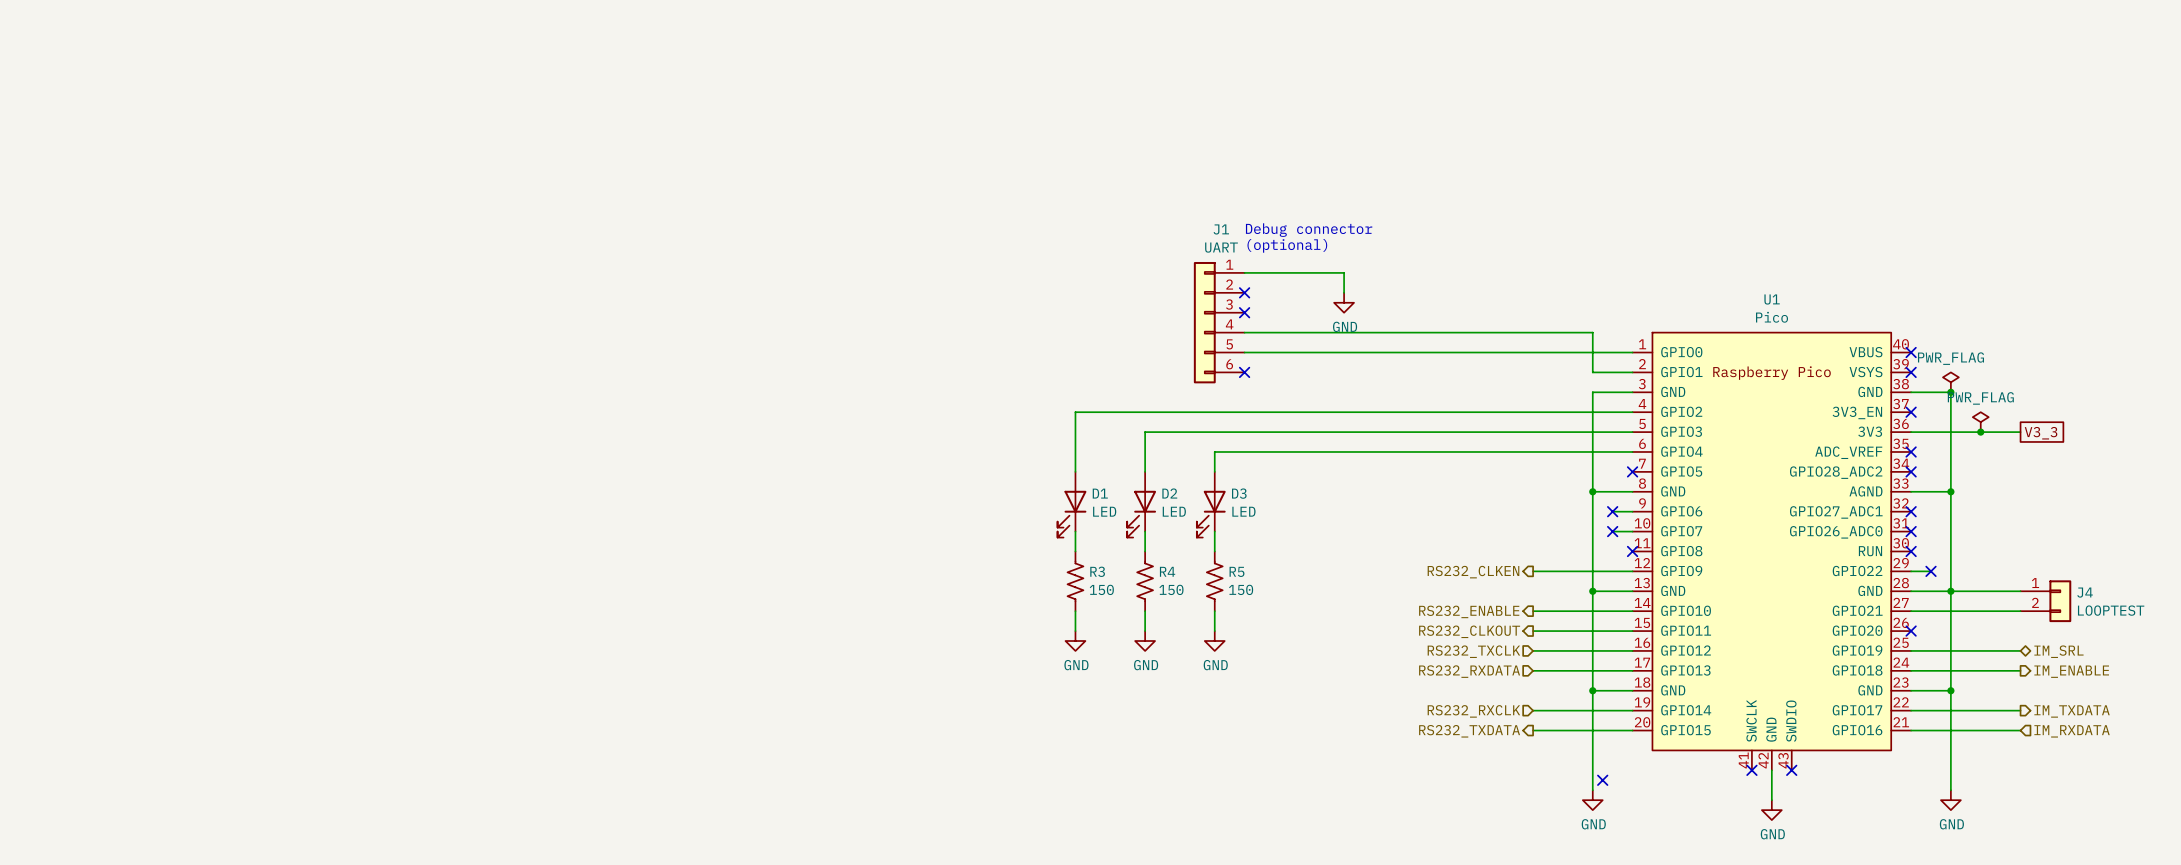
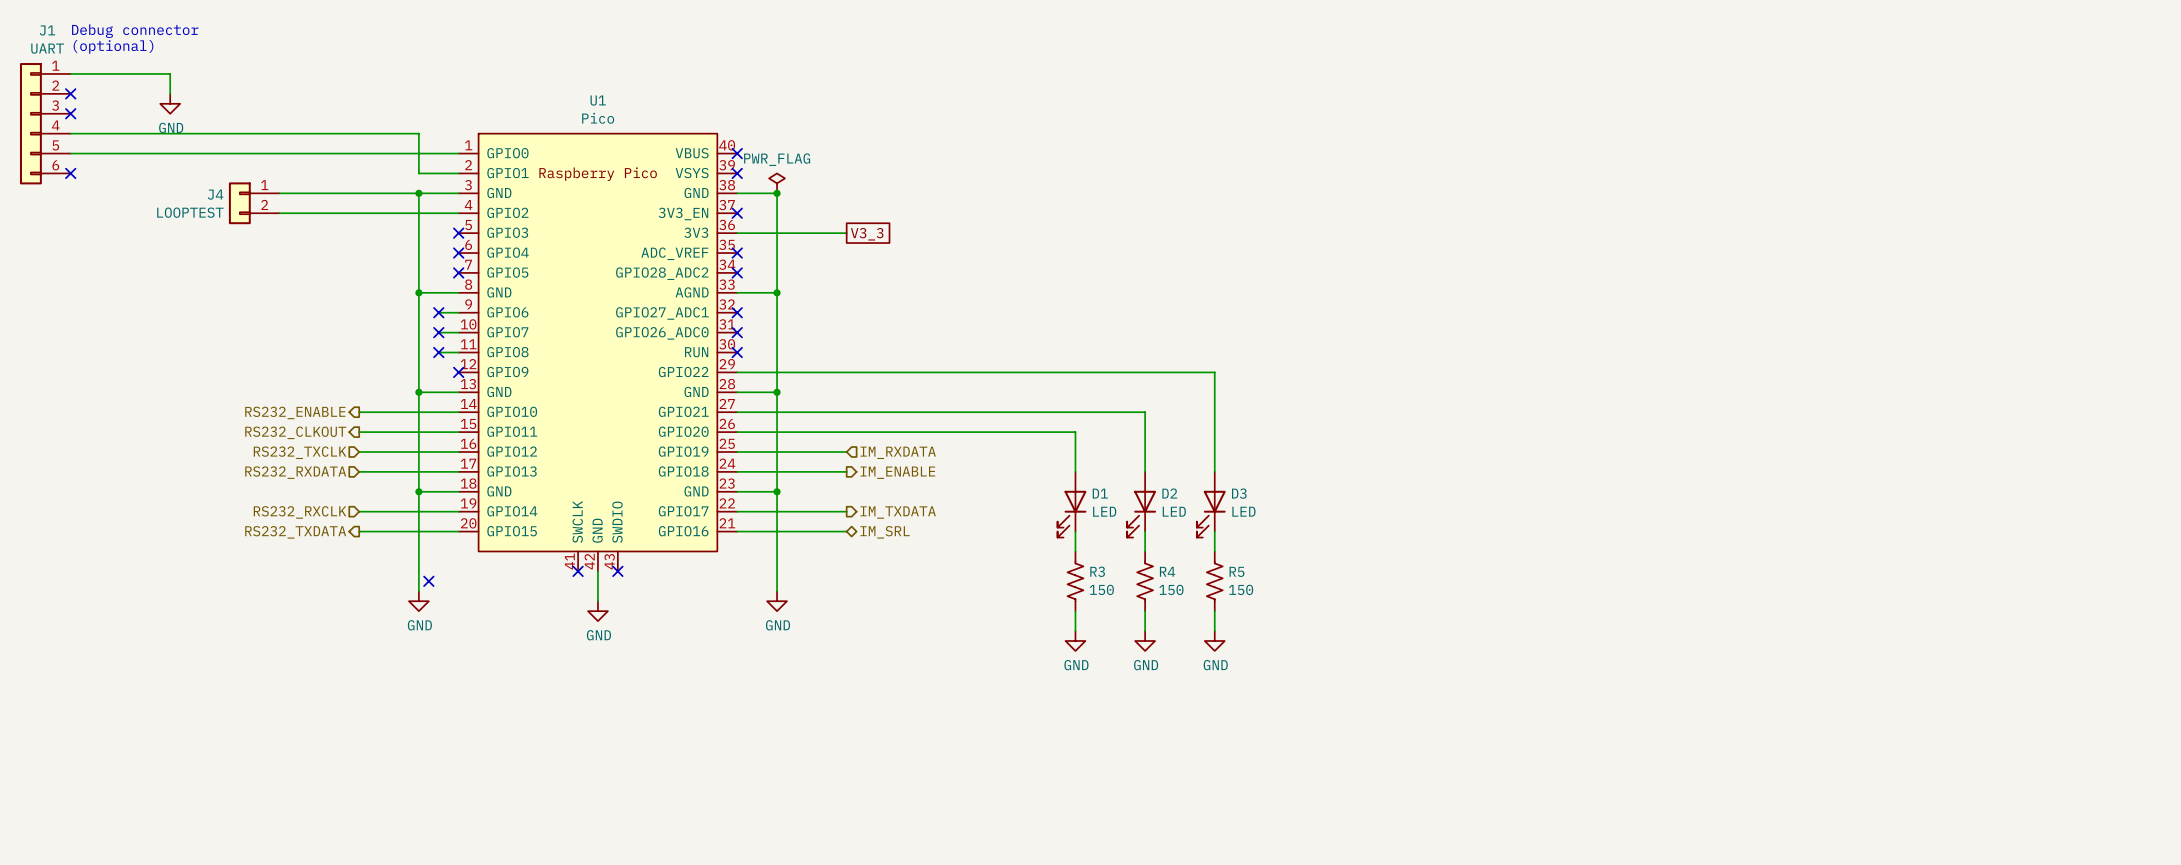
text: none -> Debug connector (135, 31)
text: none -> (optional) (113, 46)
wire: none -> (70, 73) (170, 73) (170, 93)
no-connect mark: none -> (70, 93)
power symbol: none -> GND (170, 103)
no-connect mark: none -> (70, 113)
wire: none -> (70, 133) (418, 133) (418, 173) (458, 173)
wire: none -> (70, 153) (458, 153)
no-connect mark: none -> (737, 153)
no-connect mark: none -> (70, 173)
no-connect mark: none -> (737, 173)
power symbol: none -> PWR_FLAG (777, 183)
wire: none -> (279, 193) (458, 193)
wire: none -> (418, 193) (418, 591)
junction: none -> (418, 193)
wire: none -> (737, 193) (777, 193) (777, 591)
junction: none -> (777, 193)
wire: none -> (279, 213) (458, 213)
no-connect mark: none -> (737, 213)
text: Debug connector (1309, 230) -> none
no-connect mark: none -> (458, 233)
wire: none -> (737, 233) (846, 233)
global label: none -> V3_3 (867, 234)
text: (optional) (1287, 245) -> none
no-connect mark: none -> (458, 253)
no-connect mark: none -> (737, 253)
no-connect mark: none -> (458, 272)
no-connect mark: none -> (737, 272)
wire: (1244, 272) (1344, 272) (1344, 292) -> none
wire: none -> (418, 292) (458, 292)
junction: none -> (418, 292)
wire: none -> (737, 292) (777, 292)
junction: none -> (777, 292)
no-connect mark: (1244, 292) -> none
power symbol: GND (1344, 302) -> none
wire: none -> (438, 312) (458, 312)
no-connect mark: none -> (438, 312)
no-connect mark: none -> (737, 312)
no-connect mark: (1244, 312) -> none
J1 position: (1219, 322) -> (45, 123)
wire: none -> (438, 332) (458, 332)
no-connect mark: none -> (438, 332)
no-connect mark: none -> (737, 332)
wire: (1244, 332) (1592, 332) (1592, 372) (1632, 372) -> none
wire: none -> (438, 352) (458, 352)
no-connect mark: none -> (438, 352)
no-connect mark: none -> (737, 352)
wire: (1244, 352) (1632, 352) -> none
no-connect mark: (1911, 352) -> none
no-connect mark: none -> (458, 372)
no-connect mark: (1244, 372) -> none
no-connect mark: (1911, 372) -> none
power symbol: PWR_FLAG (1950, 382) -> none
wire: none -> (418, 392) (458, 392)
junction: none -> (418, 392)
wire: none -> (737, 392) (777, 392)
junction: none -> (777, 392)
wire: (1632, 392) (1592, 392) (1592, 790) -> none
wire: (1911, 392) (1950, 392) (1950, 790) -> none
junction: (1950, 392) -> none
hierarchical label: none -> RS232_ENABLE (295, 412)
wire: none -> (359, 412) (458, 412)
wire: (1075, 412) (1075, 432) -> (1075, 412) (737, 412)
wire: (1145, 412) (1632, 412) -> (1145, 412) (1145, 432)
no-connect mark: (1911, 412) -> none
power symbol: PWR_FLAG (1980, 422) -> none
hierarchical label: none -> RS232_CLKOUT (295, 432)
wire: none -> (359, 432) (458, 432)
wire: none -> (737, 432) (1075, 432)
wire: (1145, 432) (1632, 432) -> none
wire: (1911, 432) (2020, 432) -> none
junction: (1980, 432) -> none
global label: V3_3 (2041, 433) -> none
wire: none -> (359, 451) (458, 451)
wire: none -> (737, 451) (846, 451)
wire: (1214, 451) (1632, 451) -> (1214, 451) (1214, 372) (737, 372)
no-connect mark: (1911, 451) -> none
hierarchical label: none -> RS232_TXCLK (300, 452)
hierarchical label: none -> IM_RXDATA (898, 452)
wire: none -> (359, 471) (458, 471)
wire: none -> (737, 471) (846, 471)
no-connect mark: (1632, 471) -> none
no-connect mark: (1911, 471) -> none
hierarchical label: none -> RS232_RXDATA (295, 472)
hierarchical label: none -> IM_ENABLE (897, 472)
wire: none -> (418, 491) (458, 491)
junction: none -> (418, 491)
wire: none -> (737, 491) (777, 491)
junction: none -> (777, 491)
wire: (1592, 491) (1632, 491) -> none
junction: (1592, 491) -> none
wire: (1911, 491) (1950, 491) -> none
junction: (1950, 491) -> none
wire: none -> (359, 511) (458, 511)
wire: none -> (737, 511) (846, 511)
wire: (1612, 511) (1632, 511) -> none
no-connect mark: (1612, 511) -> none
no-connect mark: (1911, 511) -> none
hierarchical label: none -> RS232_RXCLK (300, 512)
hierarchical label: none -> IM_TXDATA (898, 512)
wire: none -> (359, 531) (458, 531)
wire: none -> (737, 531) (846, 531)
wire: (1612, 531) (1632, 531) -> none
no-connect mark: (1612, 531) -> none
no-connect mark: (1911, 531) -> none
hierarchical label: none -> RS232_TXDATA (295, 532)
hierarchical label: none -> IM_SRL (885, 532)
no-connect mark: (1632, 551) -> none
U1 position: (1771, 551) -> (597, 352)
no-connect mark: (1911, 551) -> none
no-connect mark: none -> (578, 571)
wire: none -> (597, 571) (597, 601)
no-connect mark: none -> (617, 571)
wire: (1533, 571) (1632, 571) -> none
wire: (1911, 571) (1931, 571) -> none
no-connect mark: (1931, 571) -> none
hierarchical label: RS232_CLKEN (1473, 572) -> none
no-connect mark: none -> (428, 581)
wire: (1592, 591) (1632, 591) -> none
junction: (1592, 591) -> none
wire: (1911, 591) (2020, 591) -> none
junction: (1950, 591) -> none
power symbol: none -> GND (418, 601)
power symbol: none -> GND (777, 601)
J4 position: (2045, 601) -> (254, 203)
J4 flip: as is (2060, 601) -> left-right (239, 203)
power symbol: none -> GND (597, 611)
hierarchical label: RS232_ENABLE (1469, 611) -> none
wire: (1533, 611) (1632, 611) -> none
wire: (1911, 611) (2020, 611) -> none
hierarchical label: RS232_CLKOUT (1469, 631) -> none
wire: (1533, 631) (1632, 631) -> none
no-connect mark: (1911, 631) -> none
wire: (1533, 650) (1632, 650) -> none
wire: (1911, 650) (2020, 650) -> none
hierarchical label: RS232_TXCLK (1473, 651) -> none
hierarchical label: IM_SRL (2058, 651) -> none
wire: (1533, 670) (1632, 670) -> none
wire: (1911, 670) (2020, 670) -> none
hierarchical label: RS232_RXDATA (1469, 671) -> none
hierarchical label: IM_ENABLE (2071, 671) -> none
wire: (1592, 690) (1632, 690) -> none
junction: (1592, 690) -> none
wire: (1911, 690) (1950, 690) -> none
junction: (1950, 690) -> none
wire: (1533, 710) (1632, 710) -> none
wire: (1911, 710) (2020, 710) -> none
hierarchical label: RS232_RXCLK (1473, 711) -> none
hierarchical label: IM_TXDATA (2072, 711) -> none
wire: (1533, 730) (1632, 730) -> none
wire: (1911, 730) (2020, 730) -> none
hierarchical label: RS232_TXDATA (1469, 731) -> none
hierarchical label: IM_RXDATA (2072, 731) -> none
no-connect mark: (1751, 770) -> none
wire: (1771, 770) (1771, 800) -> none
no-connect mark: (1791, 770) -> none
no-connect mark: (1602, 780) -> none
power symbol: GND (1592, 800) -> none
power symbol: GND (1950, 800) -> none
power symbol: GND (1771, 810) -> none

